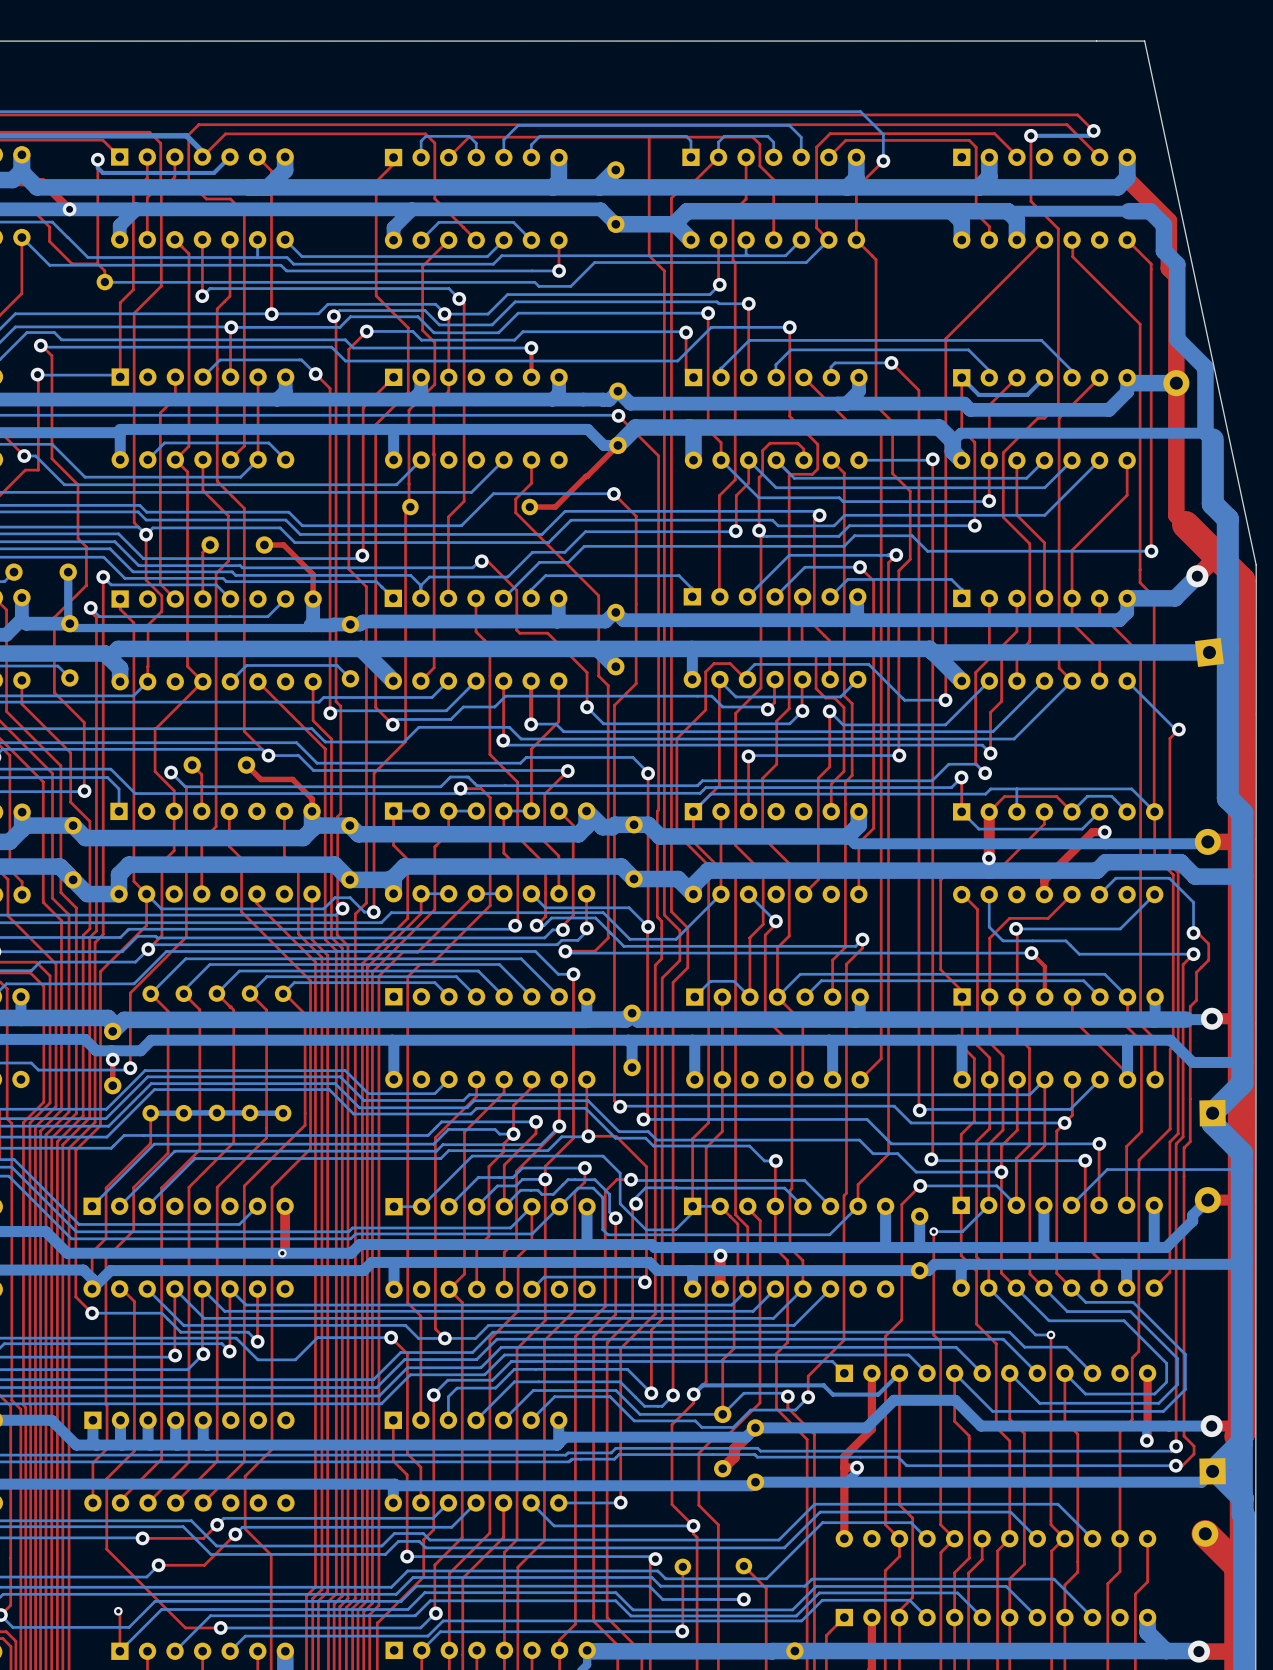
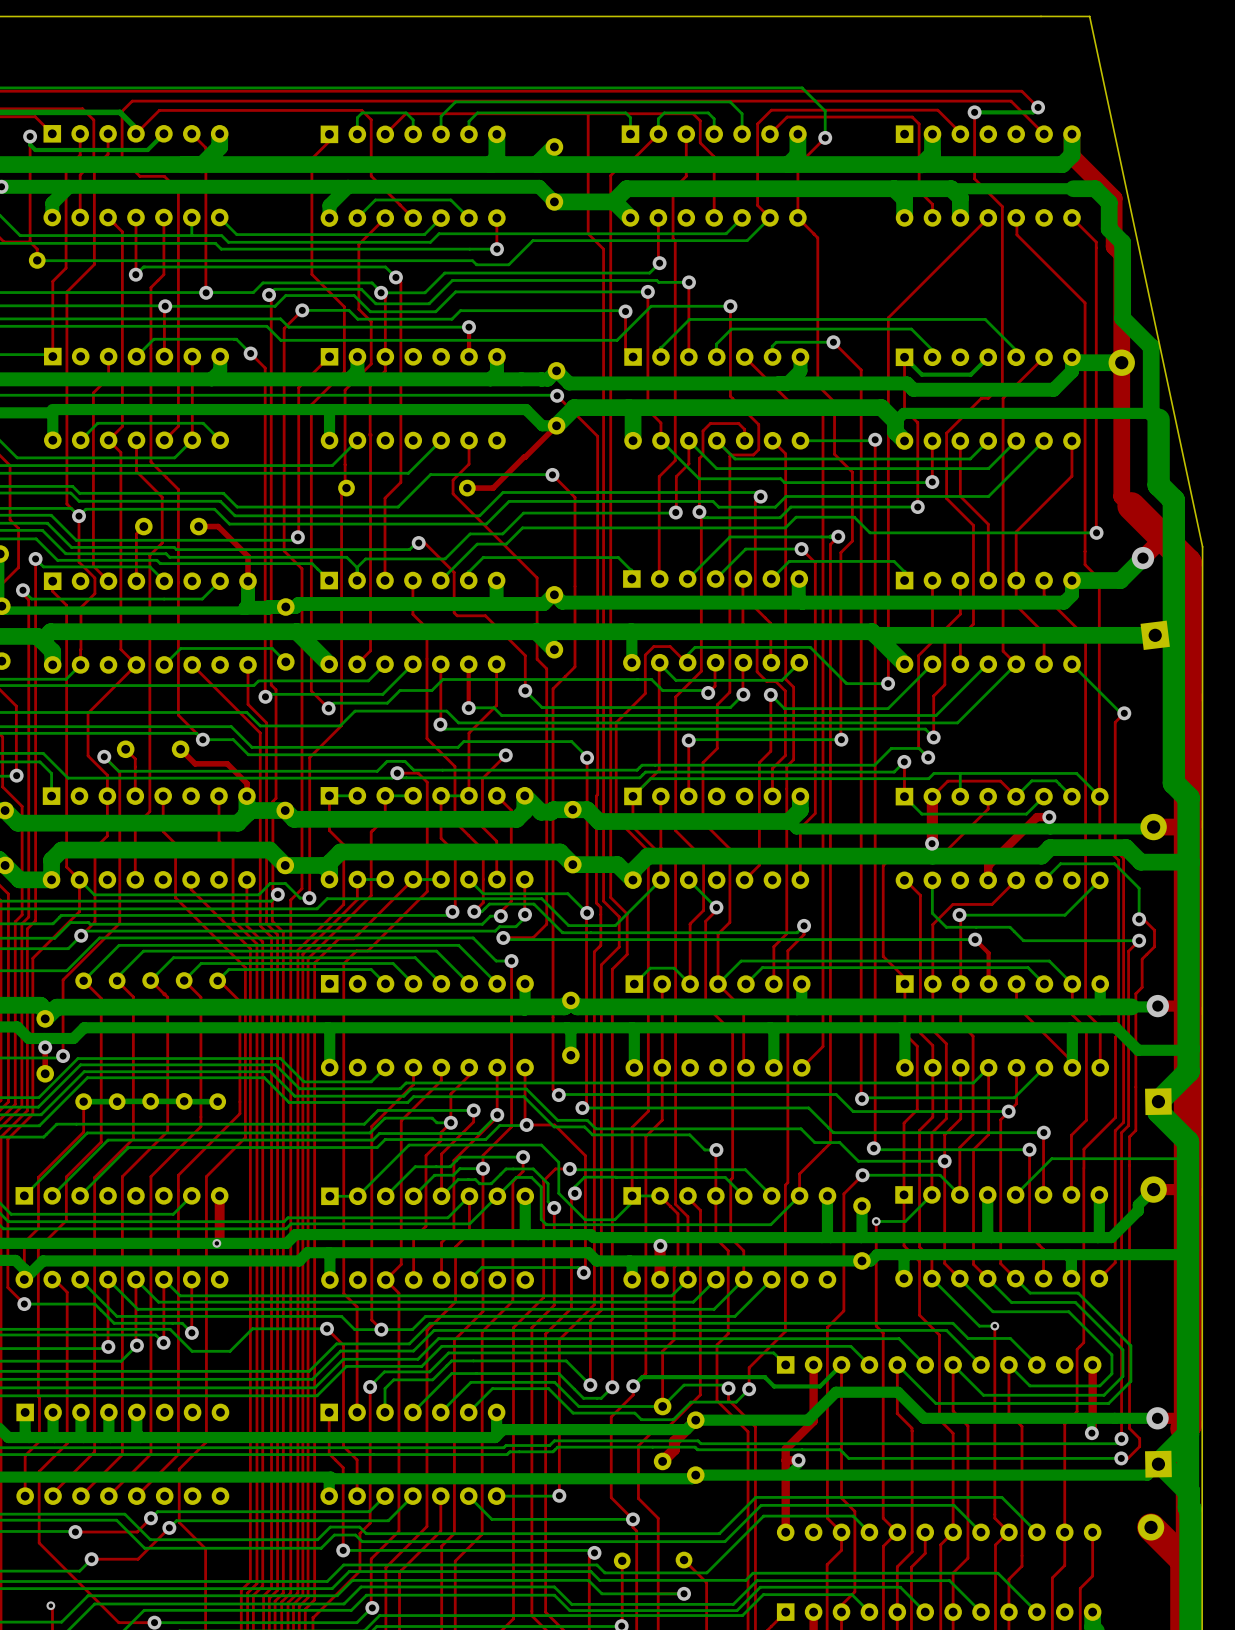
bottom track: (746, 240) (747, 255) -> none
top track: (1016, 377) (989, 405) (989, 460) -> none

